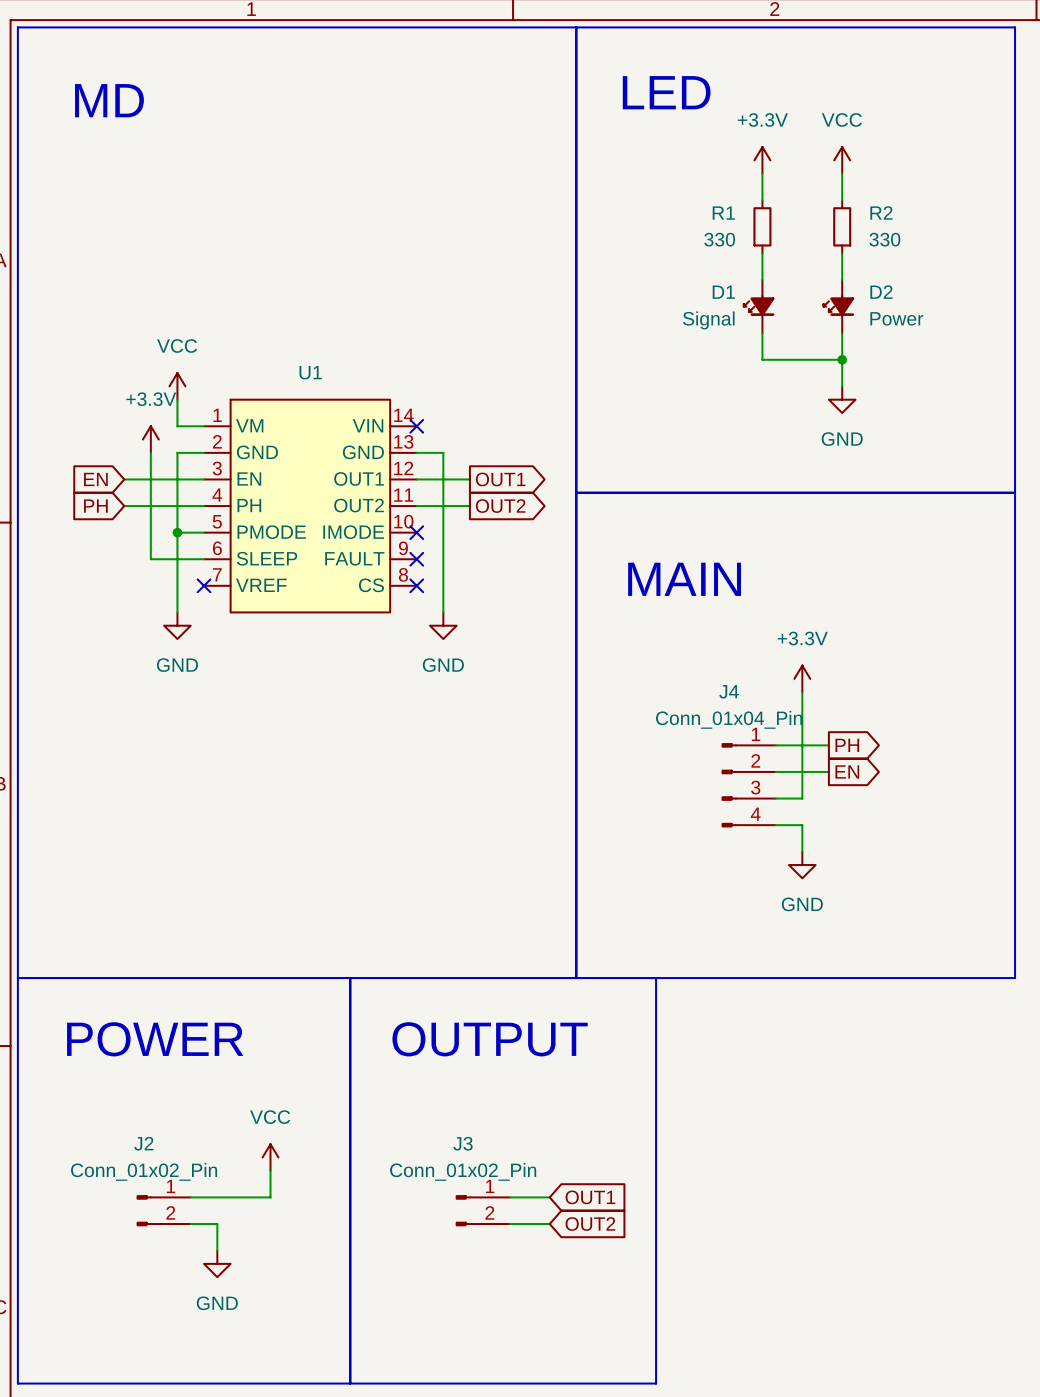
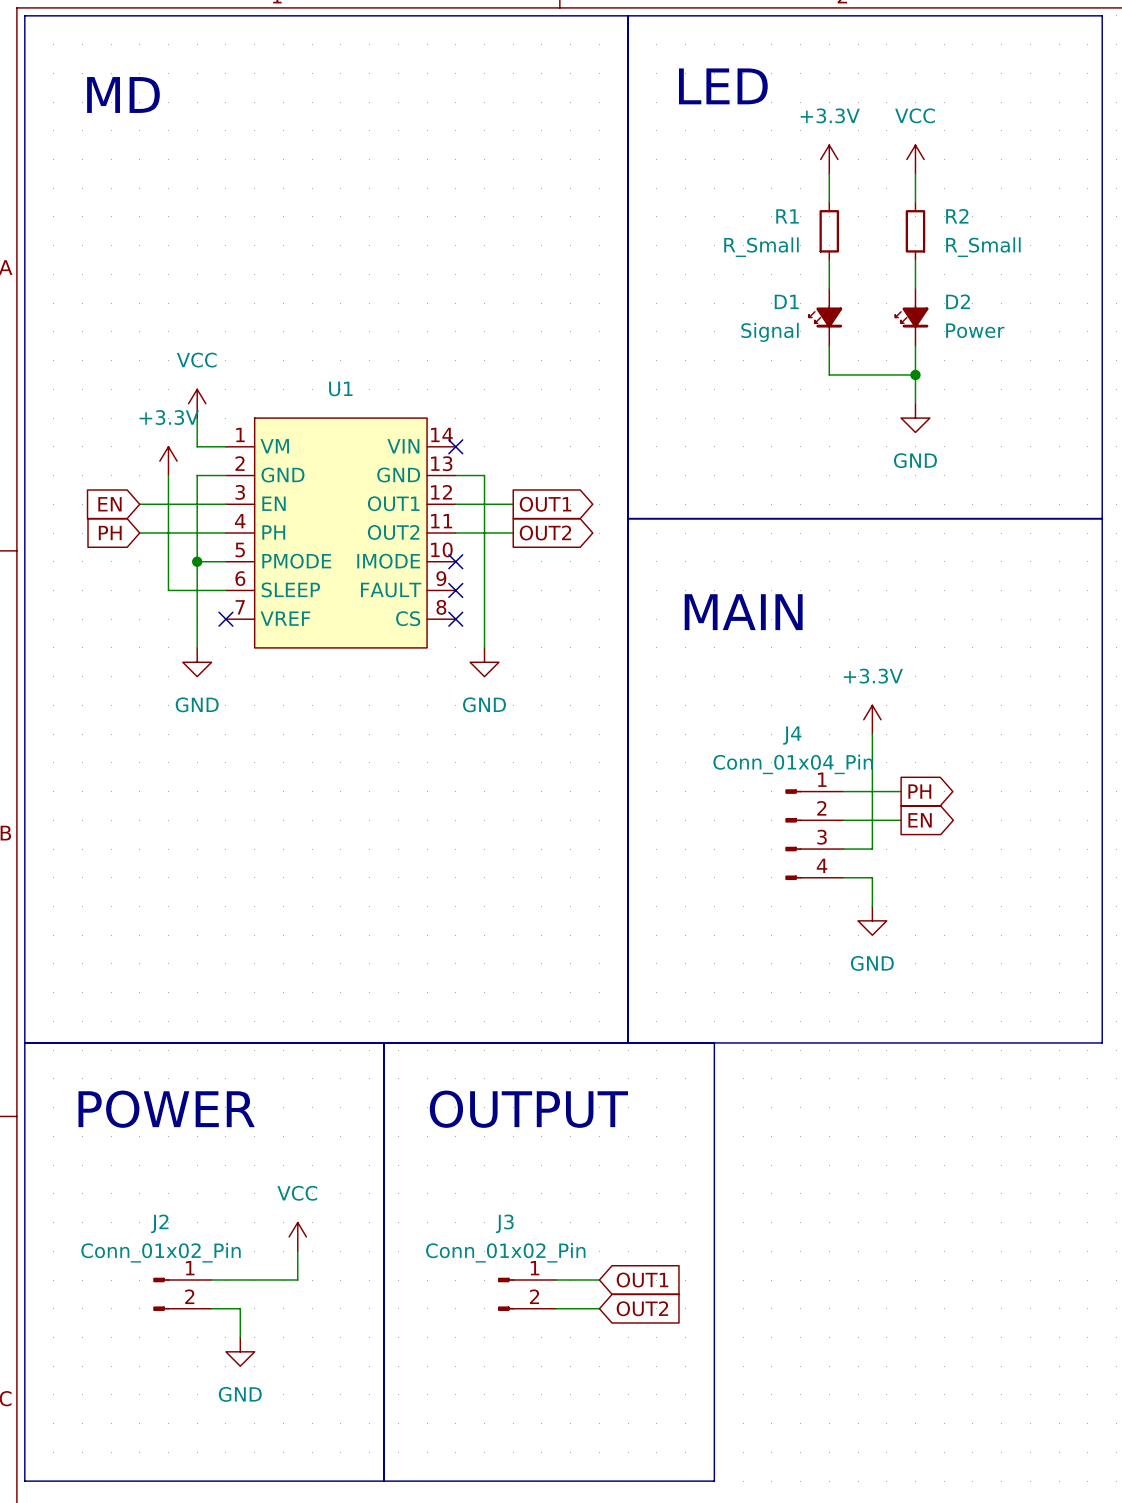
R1 value: 330 (719, 239) -> R_Small (761, 247)
R2 value: 330 (884, 239) -> R_Small (983, 247)

